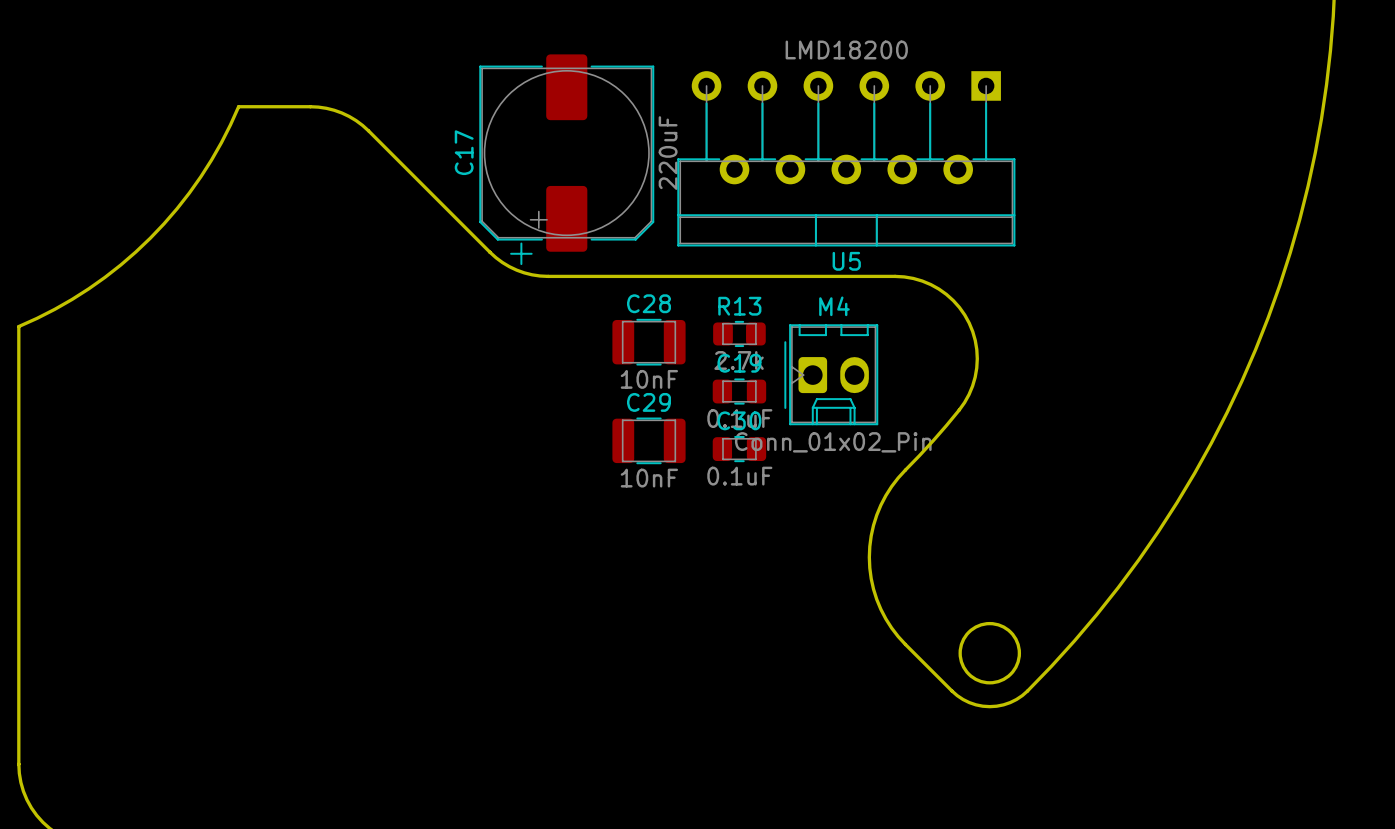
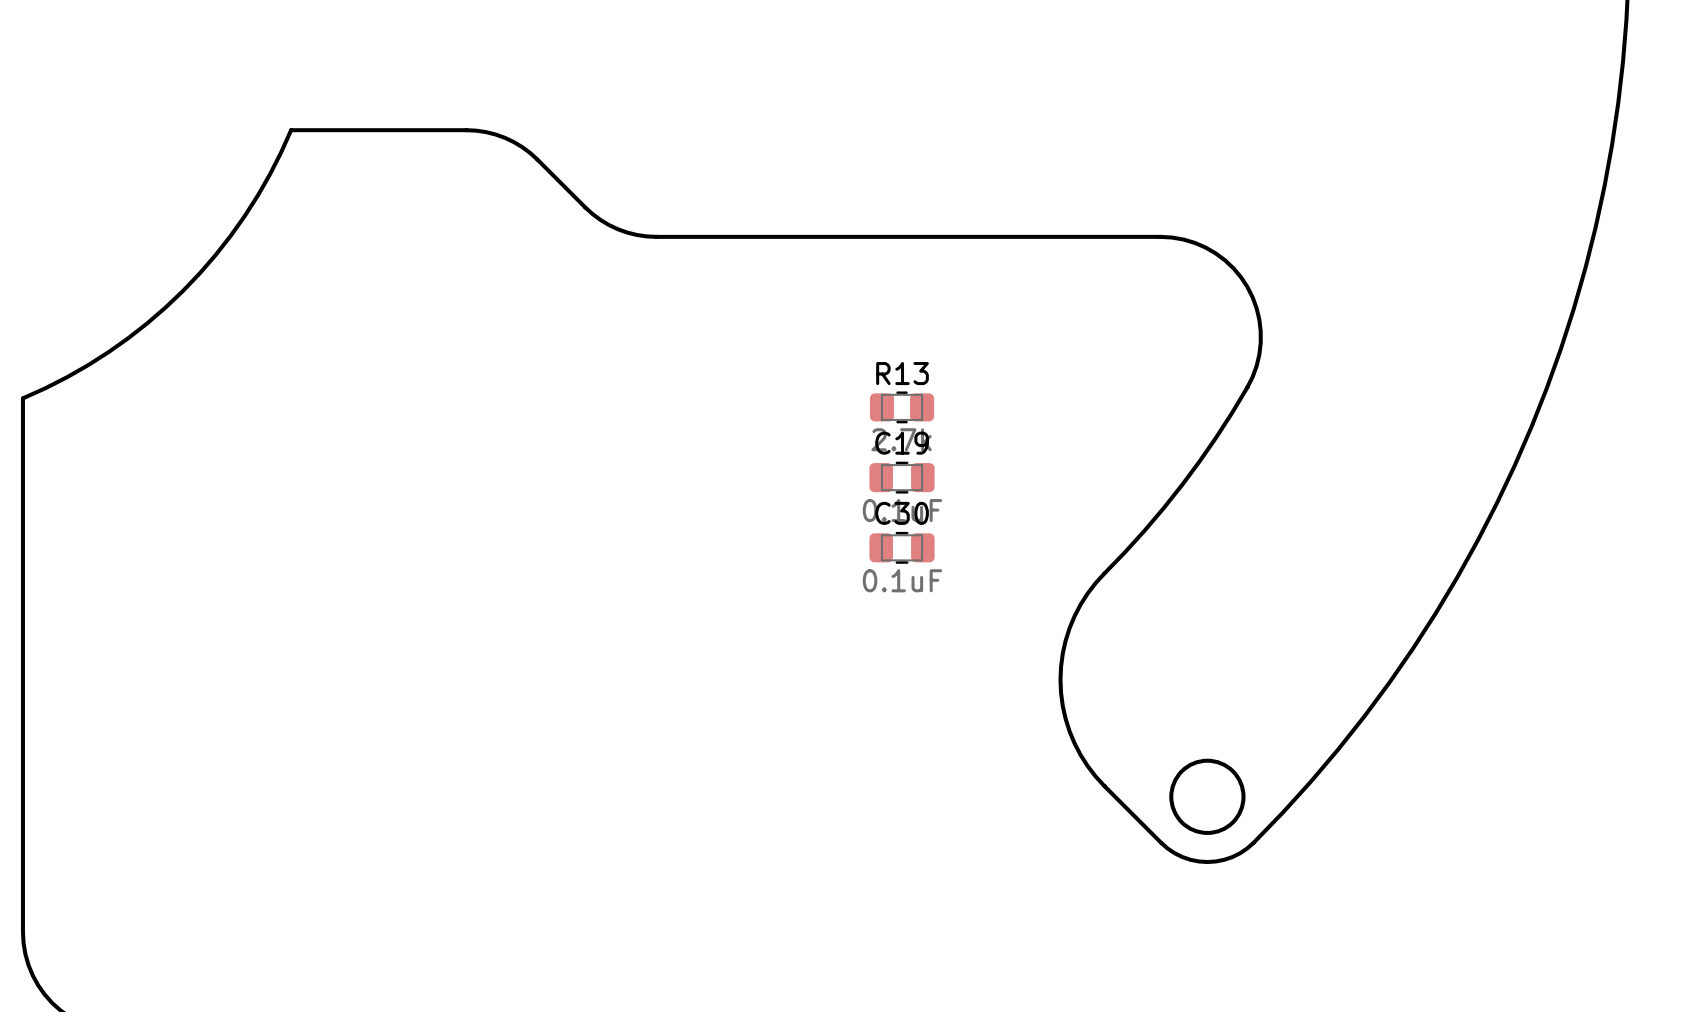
board edge: (310, 106) (326, 108) (341, 112) (362, 125) (490, 252) (509, 266) (524, 272) (548, 276) (895, 276) (922, 281) (938, 289) (959, 307) (972, 331) (977, 358) (975, 377) (969, 394) (959, 410) (905, 470) -> (378, 130) (476, 130) (504, 137) (530, 152) (600, 219) (627, 232) (646, 236) (1160, 236) (1194, 242) (1215, 253) (1233, 268) (1252, 297) (1260, 331) (1256, 366) (1247, 387) (1199, 461) (1163, 508) (1104, 573)
U5: LMD18200 (846, 158) -> none
C17: 220uF (566, 159) -> none
C28: 10nF (648, 342) -> none
M4: Conn_01x02_Pin (831, 374) -> none
C29: 10nF (648, 440) -> none

